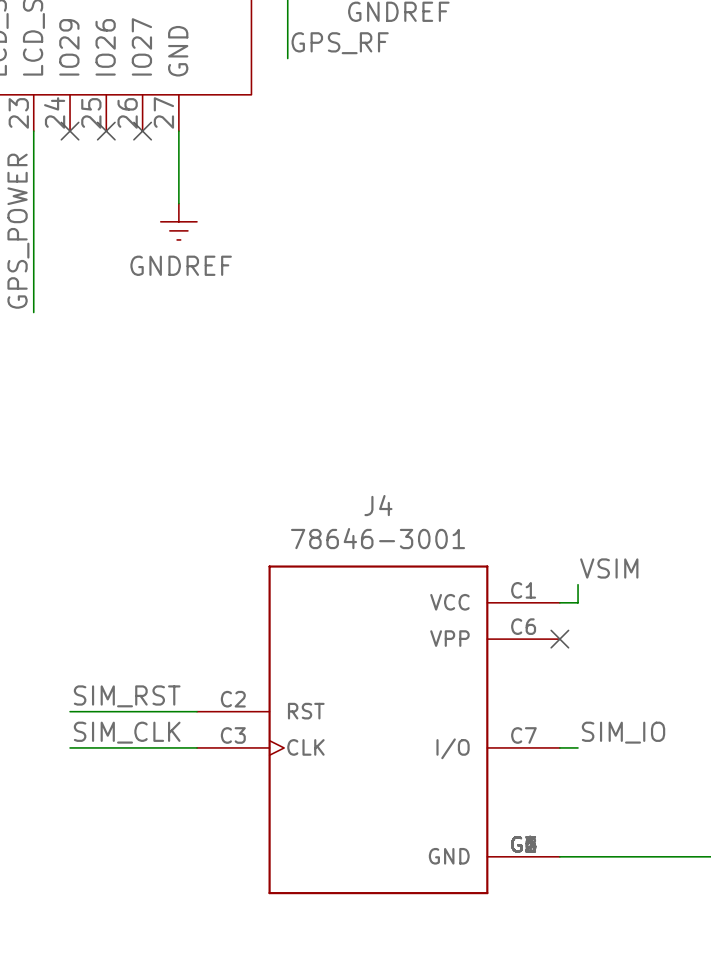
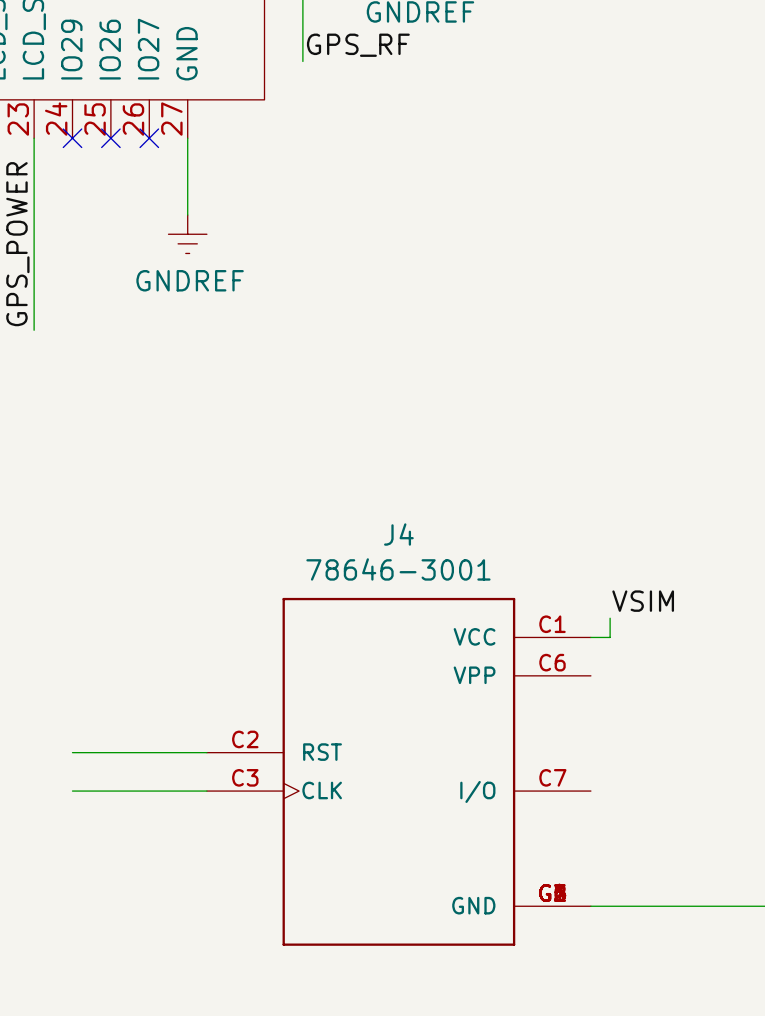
no-connect mark: (559, 639) -> none
label: SIM_RST (127, 696) -> none
label: SIM_CLK (127, 732) -> none
label: SIM_IO (623, 732) -> none
wire: (559, 747) (578, 747) -> none

